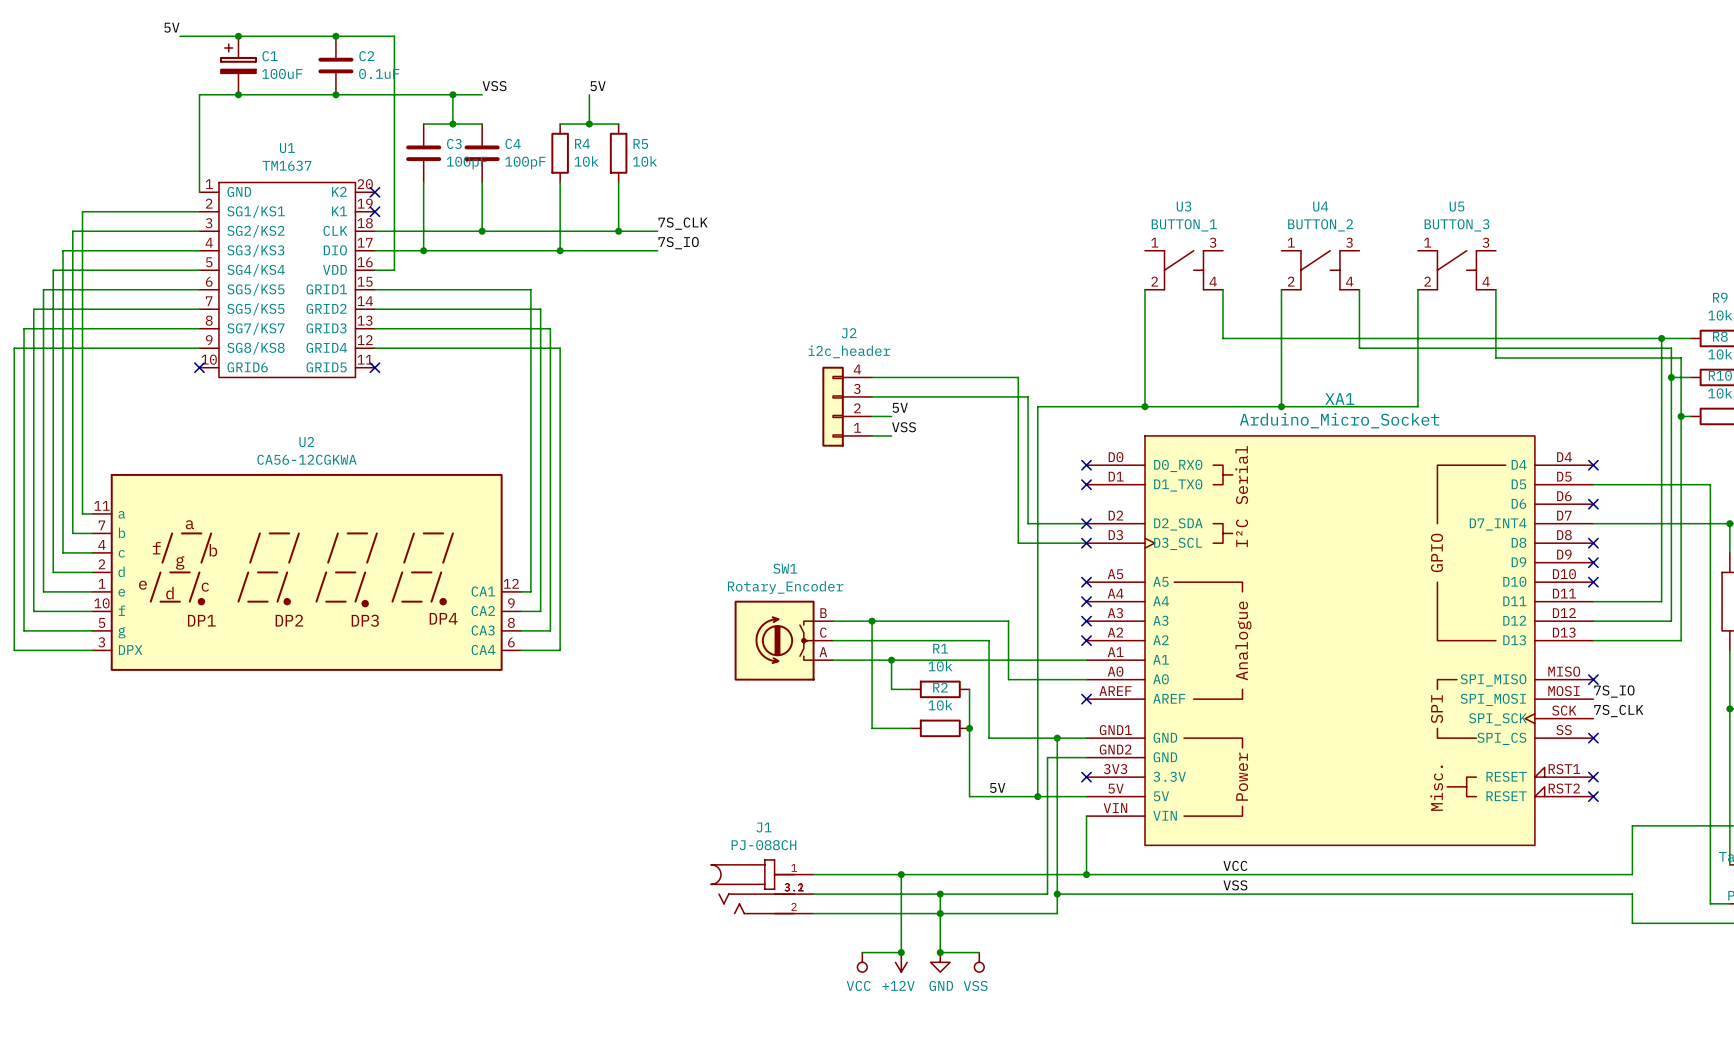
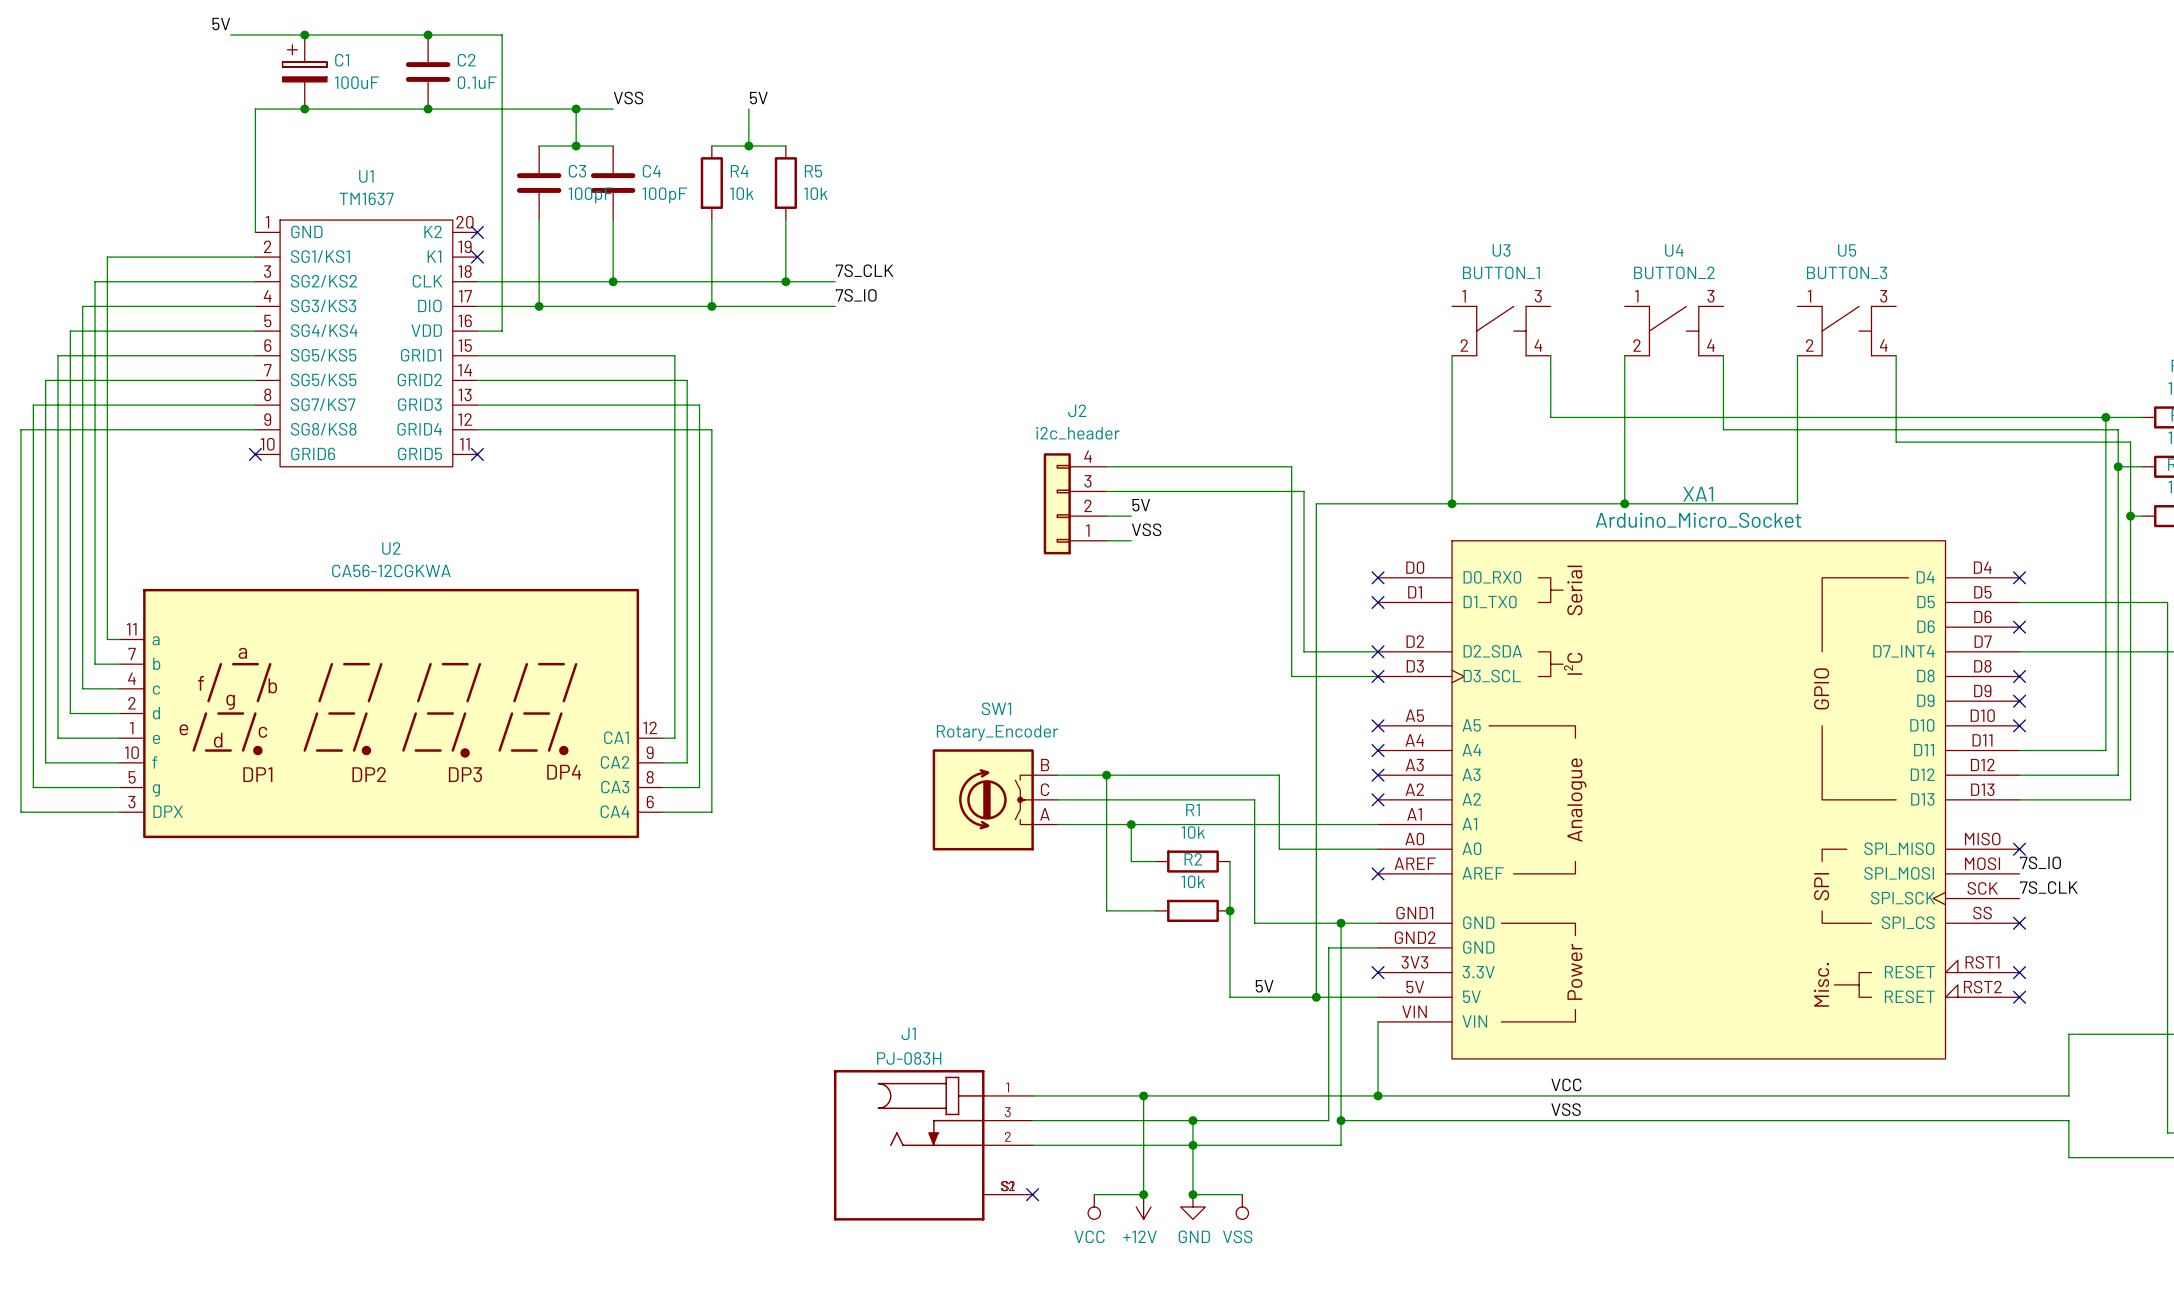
J1 name position: J1 (764, 827) -> J1 (908, 1033)
J1 value: PJ-088CH (763, 845) -> PJ-083H (909, 1058)
J1 symbol: [710, 859, 814, 915] -> [833, 1070, 1033, 1221]
no-connect mark: none -> (1032, 1194)

